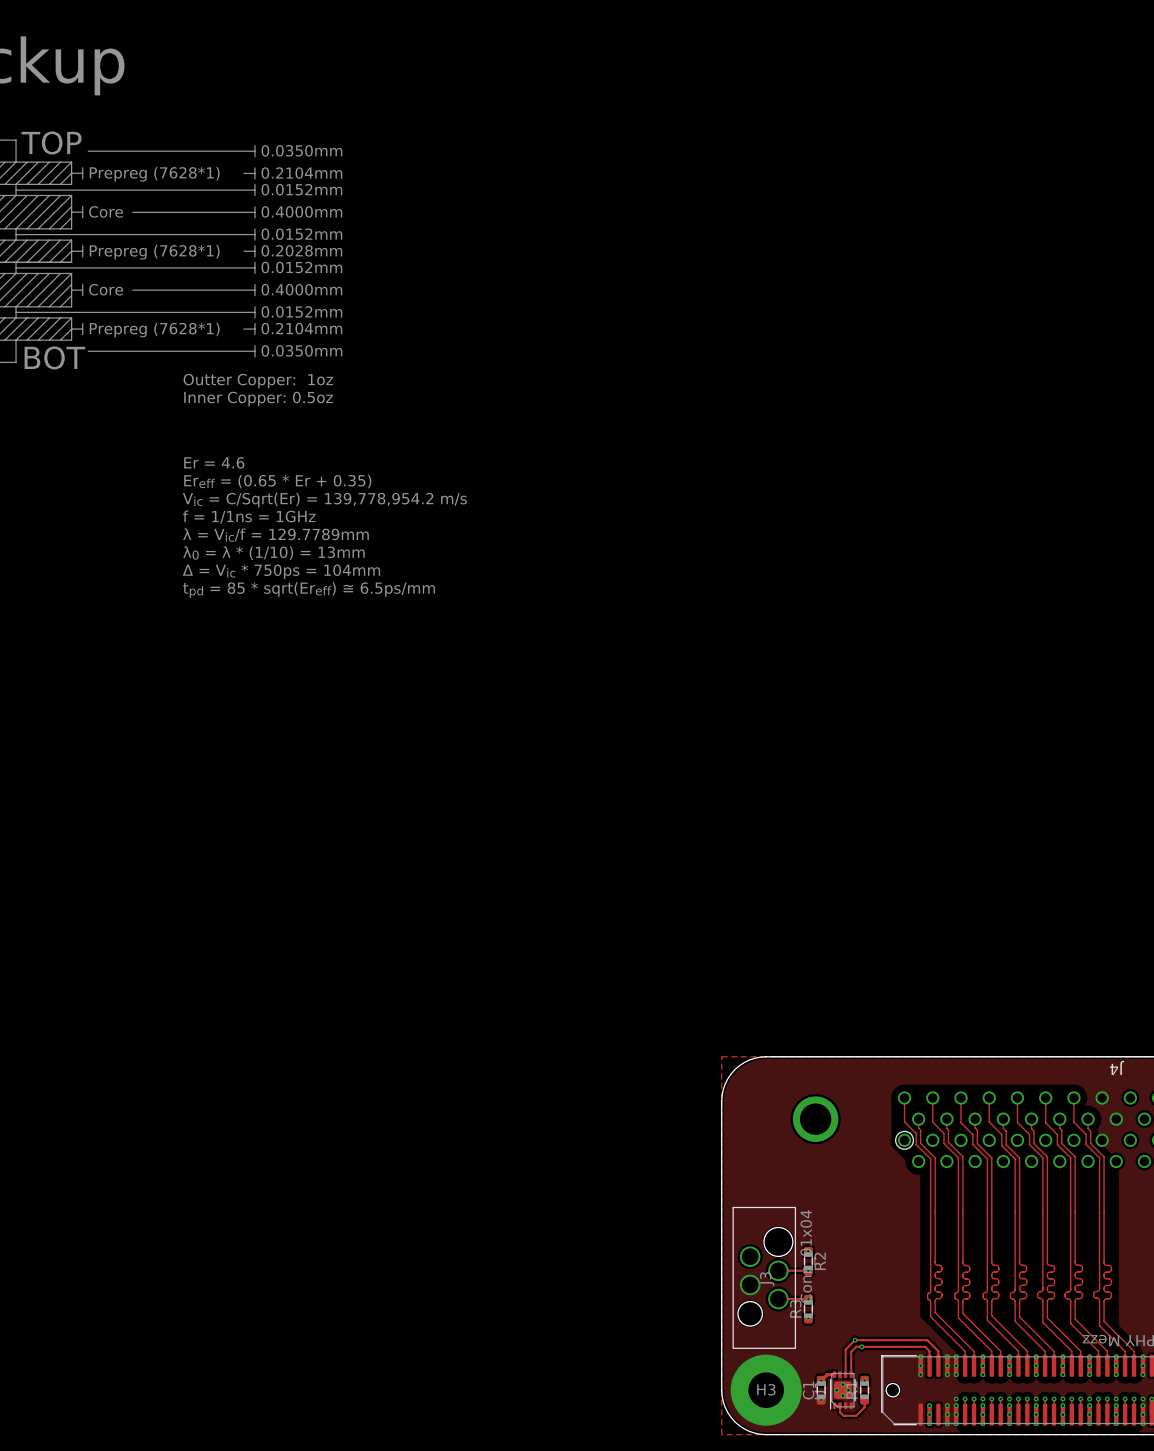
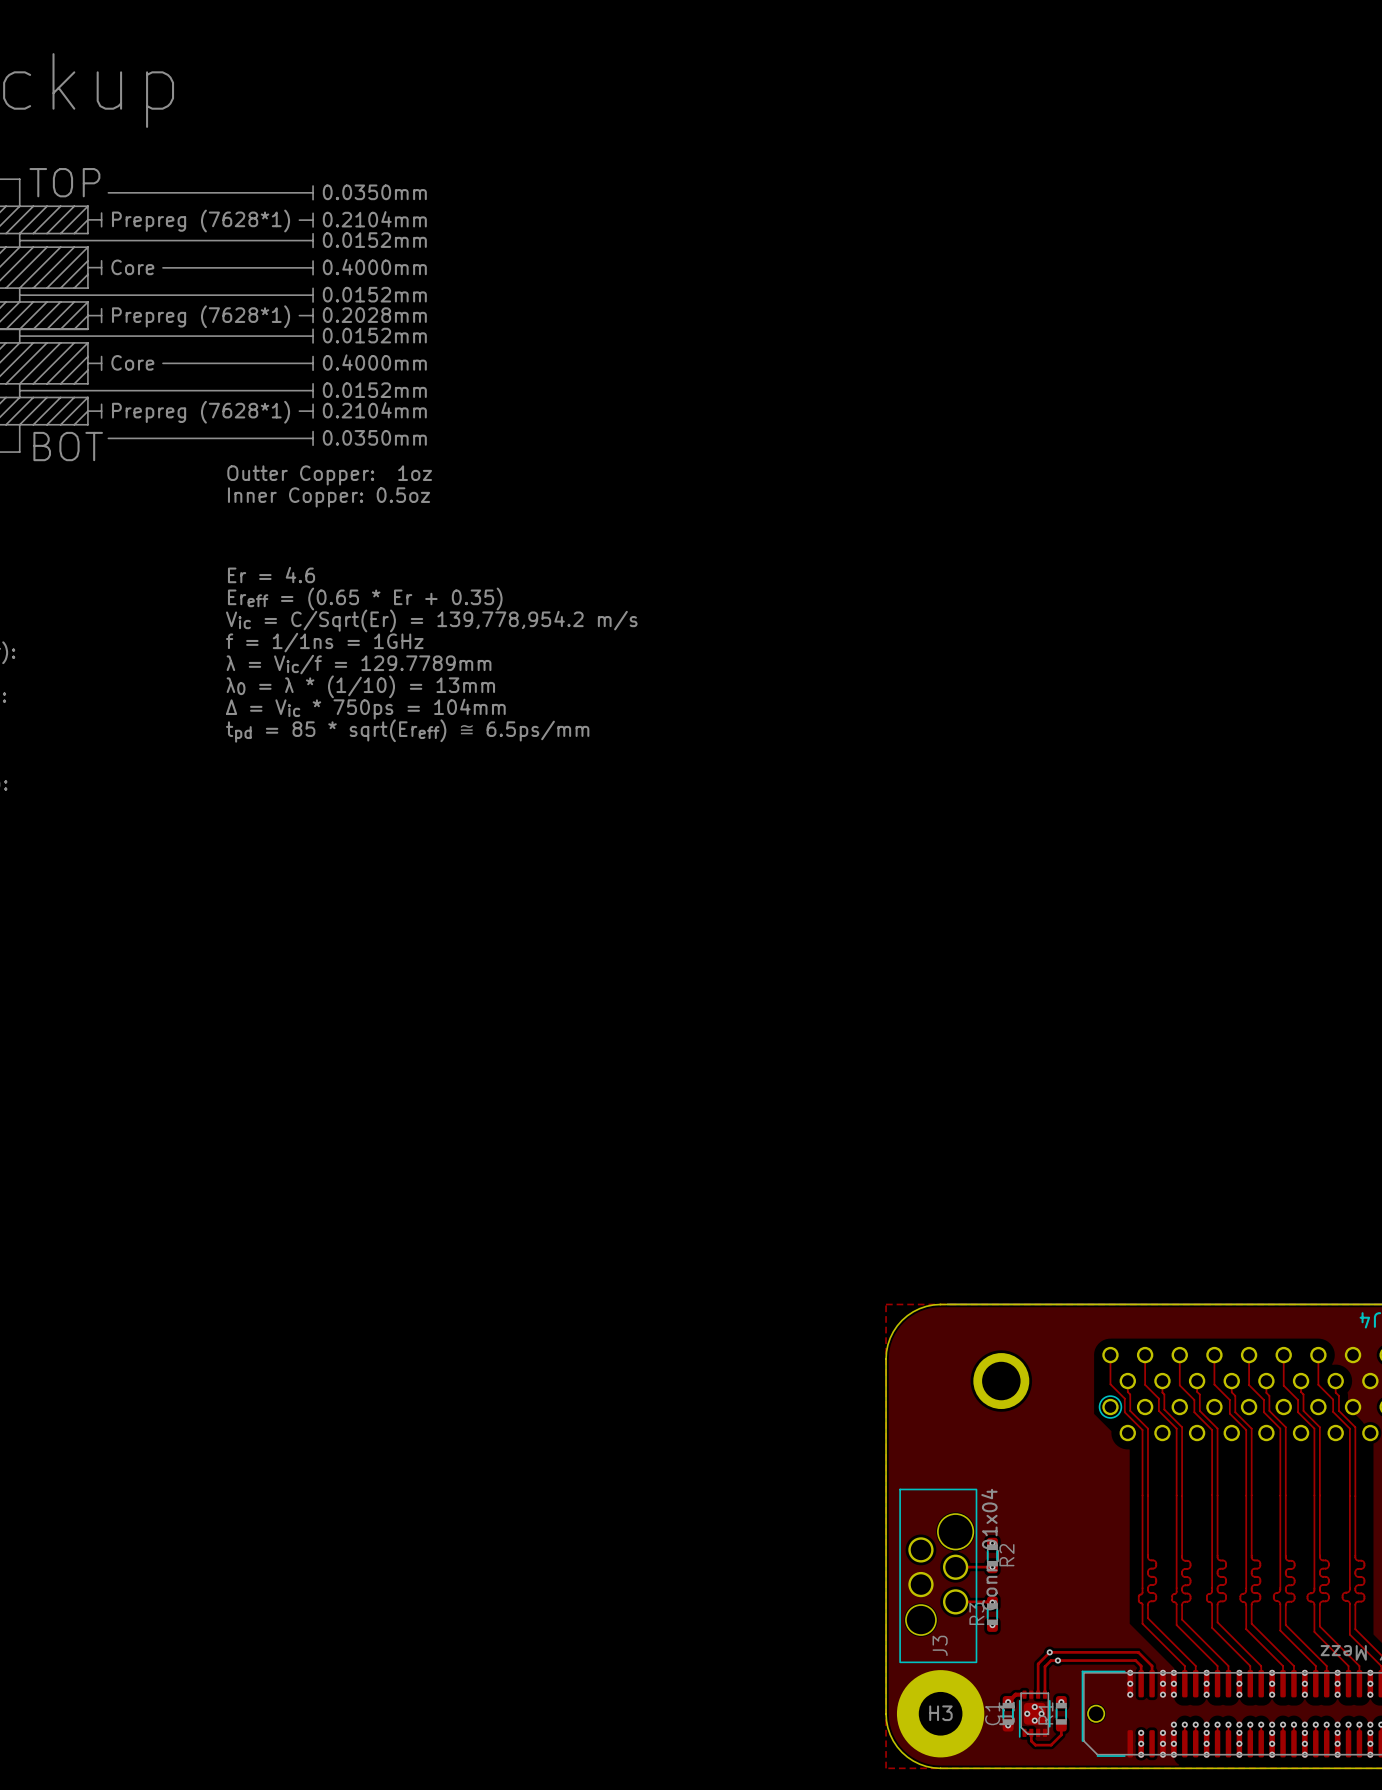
J3 name position: J3 (767, 1278) -> J3 (940, 1645)

